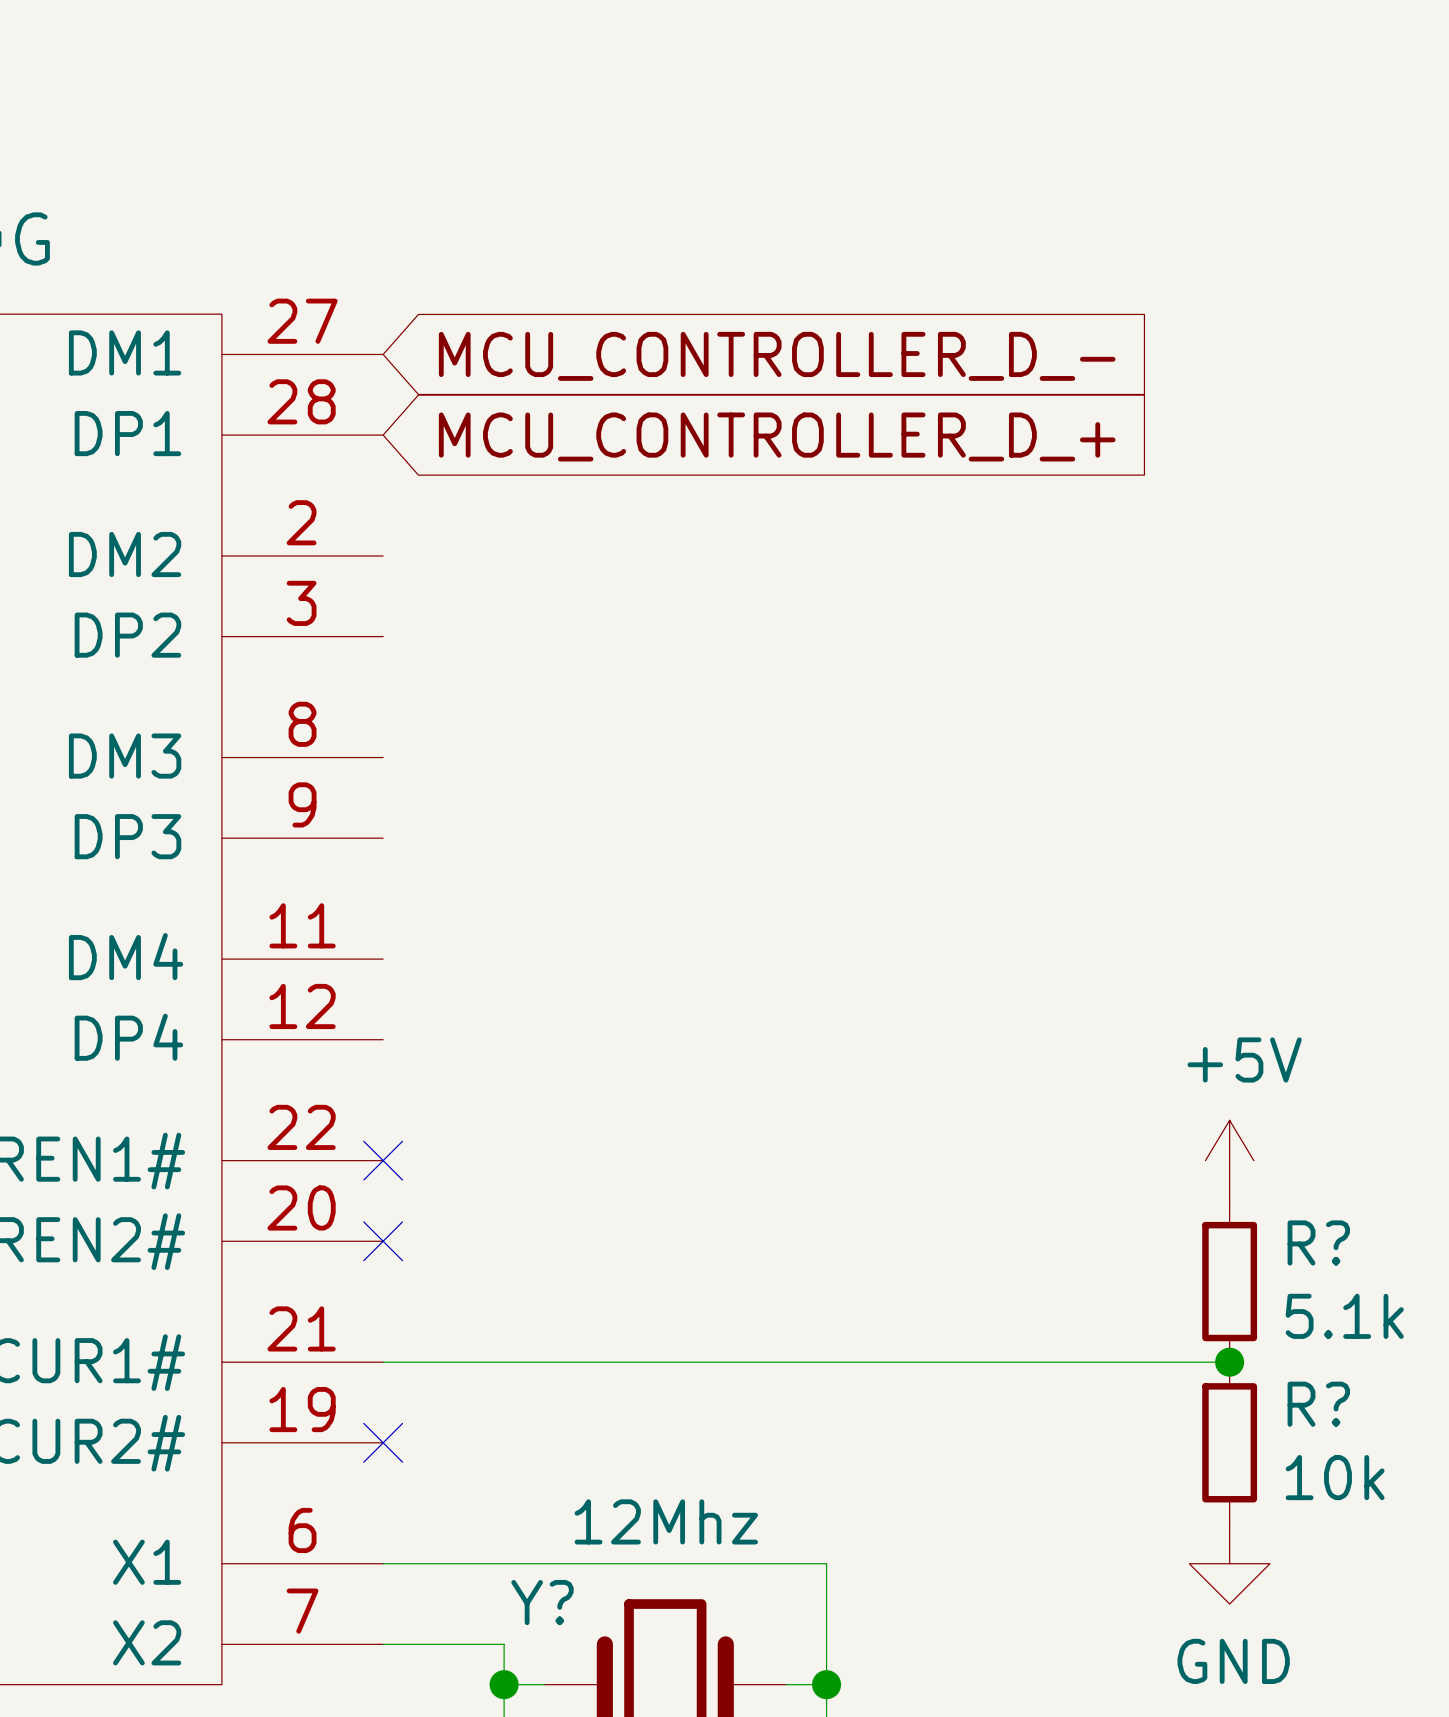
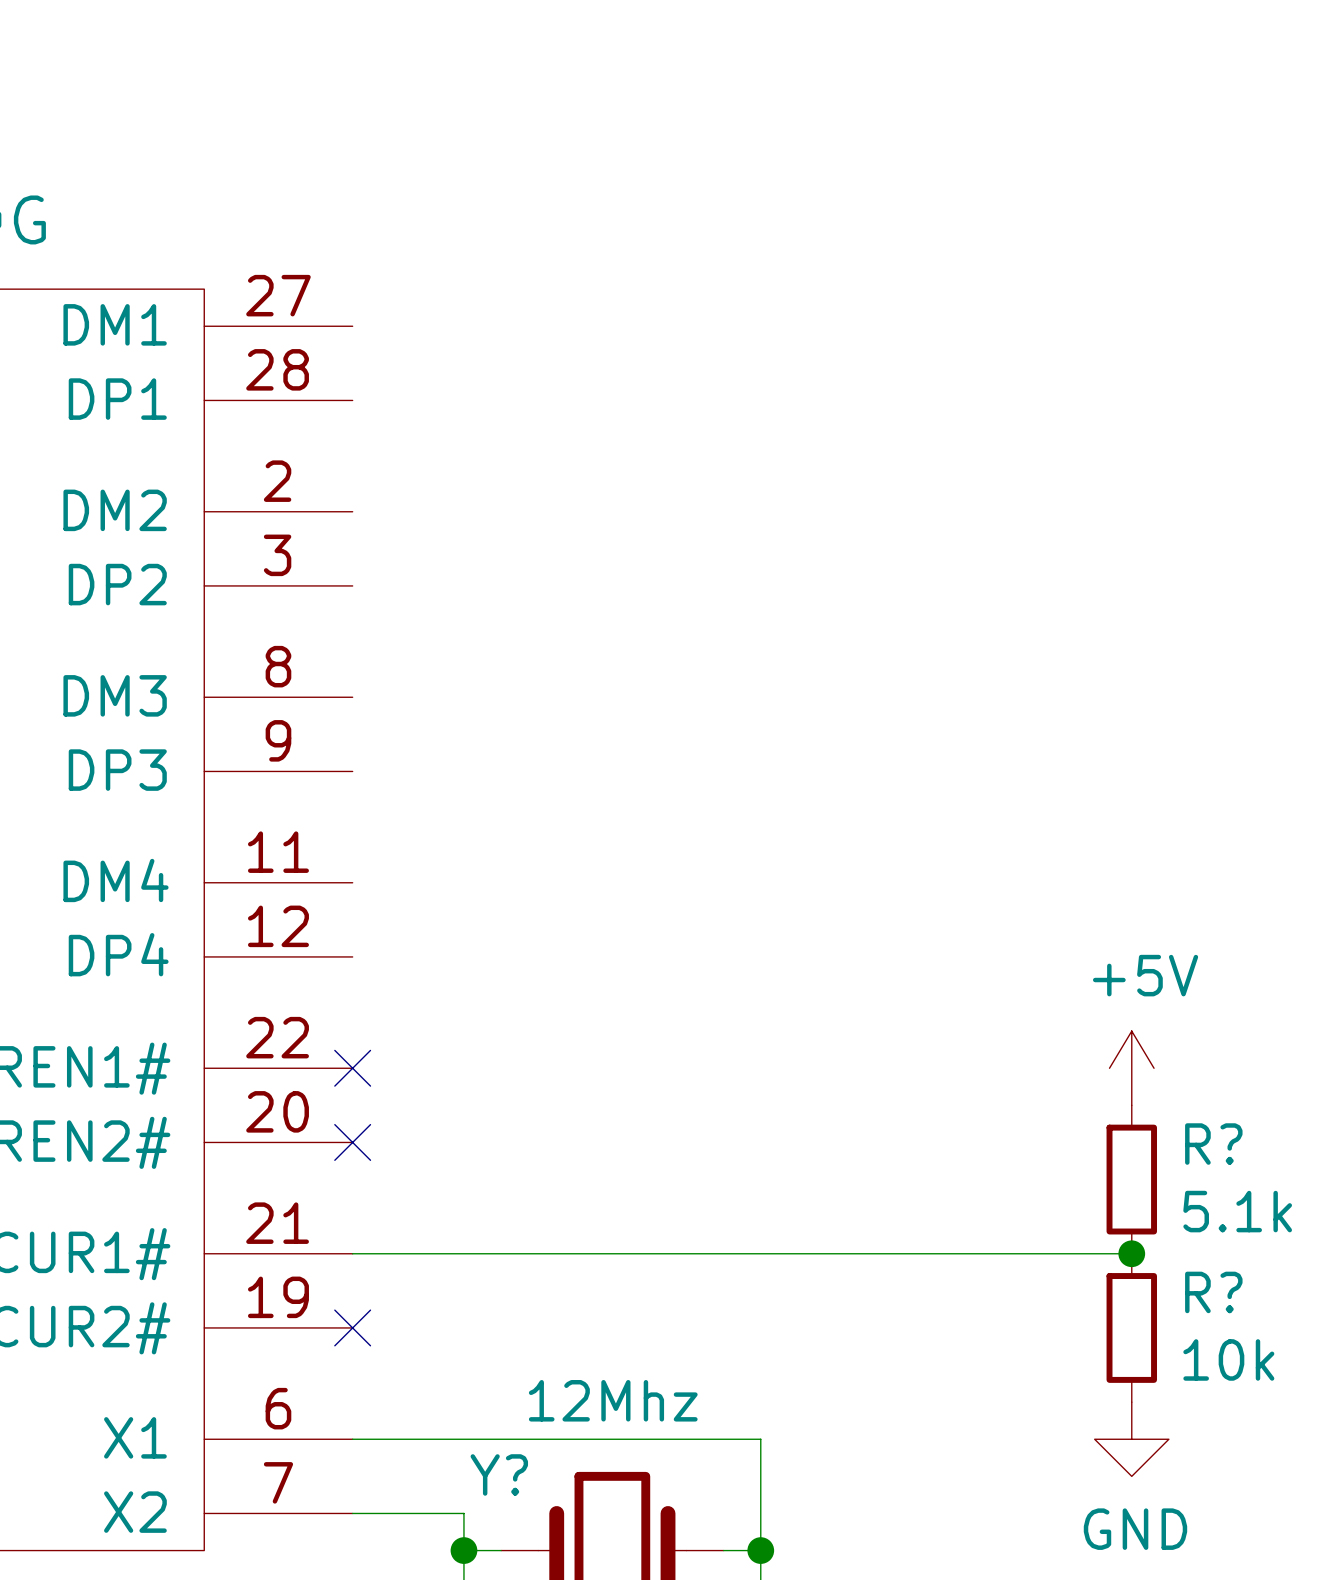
global label: MCU_CONTROLLER_D_- (777, 356) -> none
global label: MCU_CONTROLLER_D_+ (777, 437) -> none

